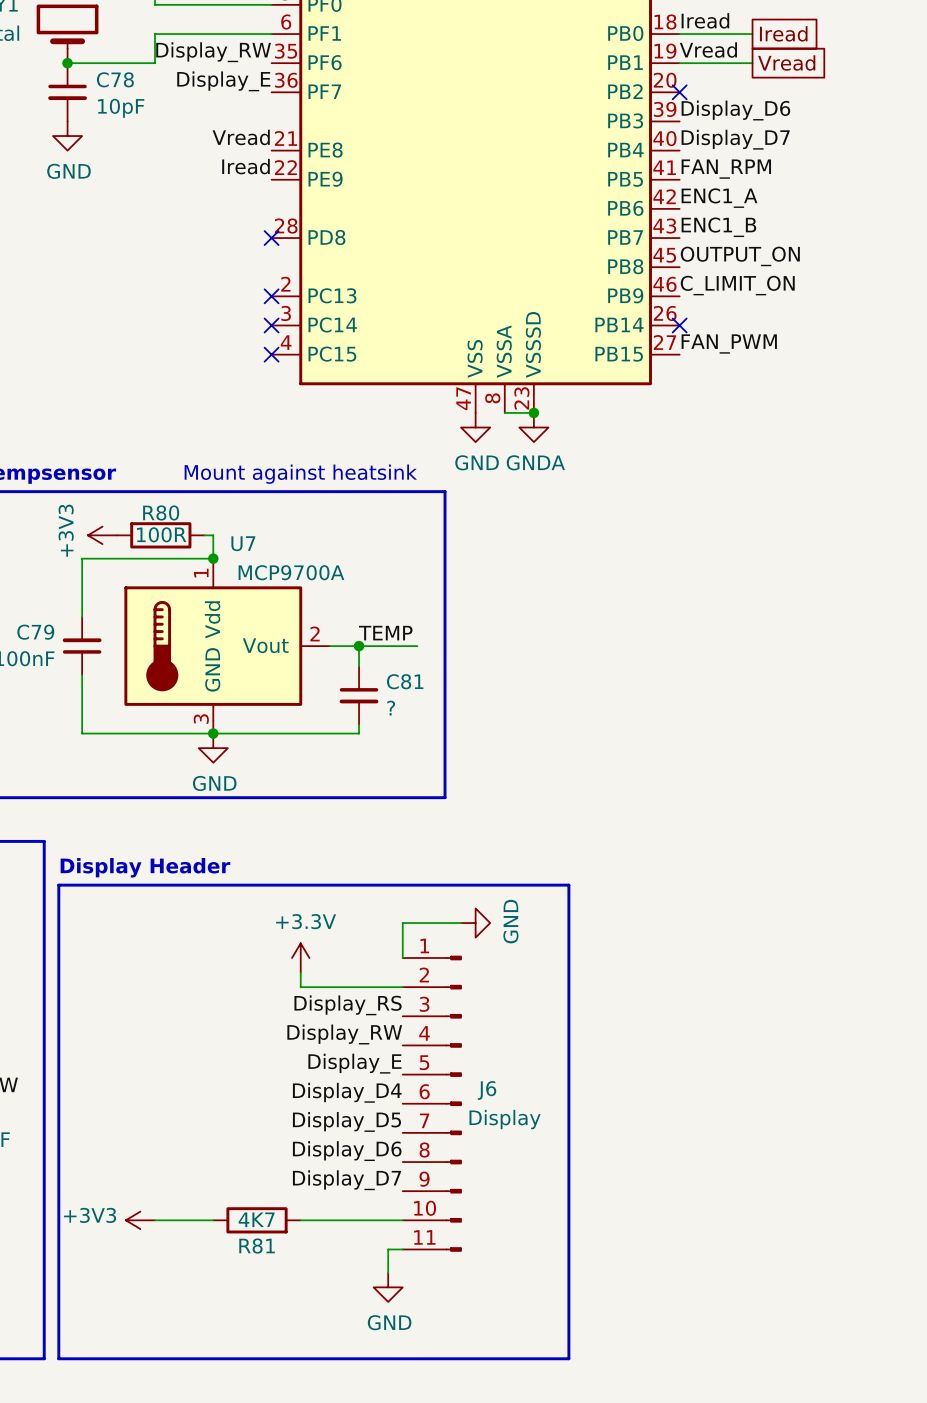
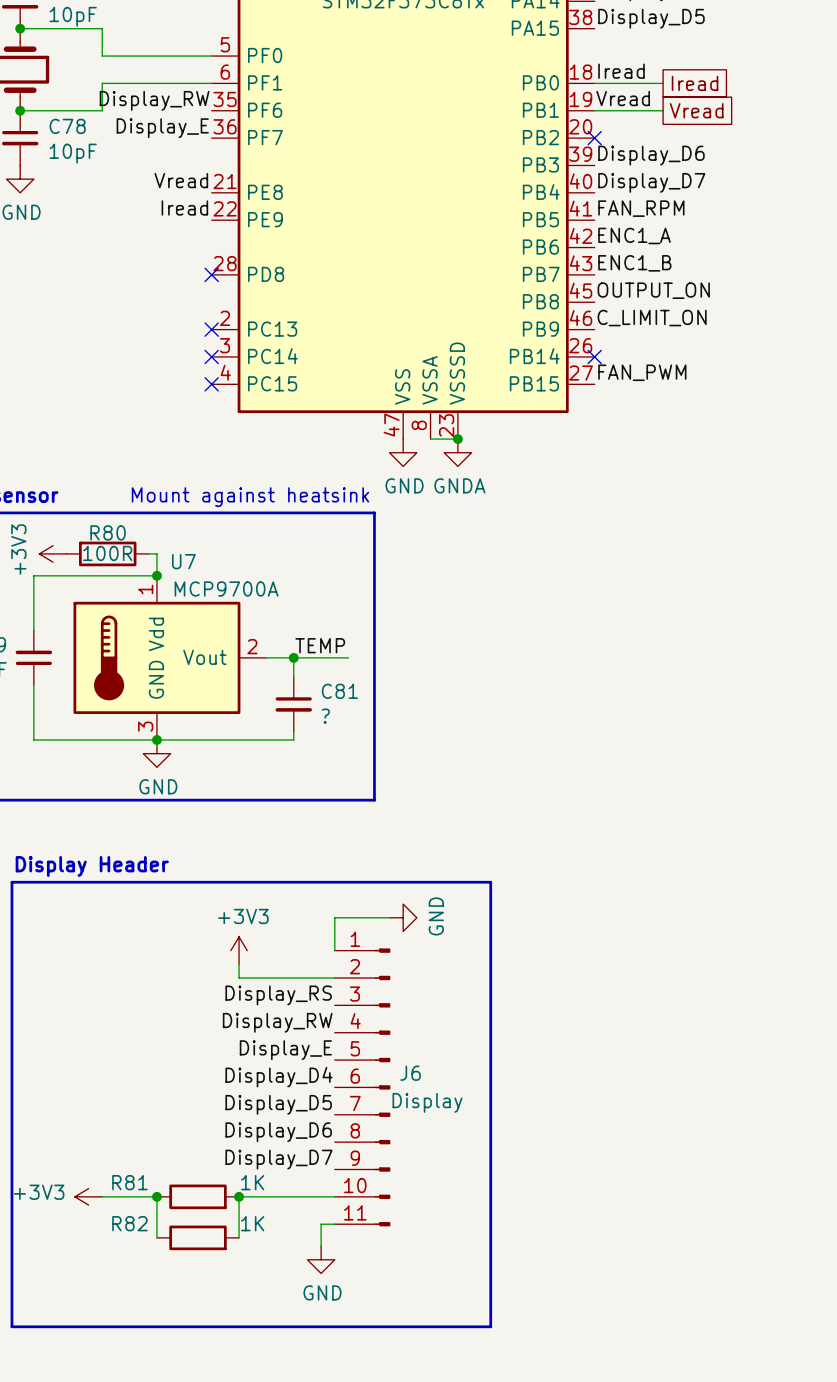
power symbol: +3.3V (300, 958) -> +3V3 (239, 950)
R81 value: 4K7 (256, 1219) -> 1K (252, 1182)
wire: none -> (156, 1196) (156, 1237)
junction: none -> (156, 1196)
wire: none -> (239, 1196) (239, 1237)
junction: none -> (239, 1196)
R81 name position: R81 (257, 1246) -> R81 (129, 1182)
R82: none -> 1K (198, 1237)

